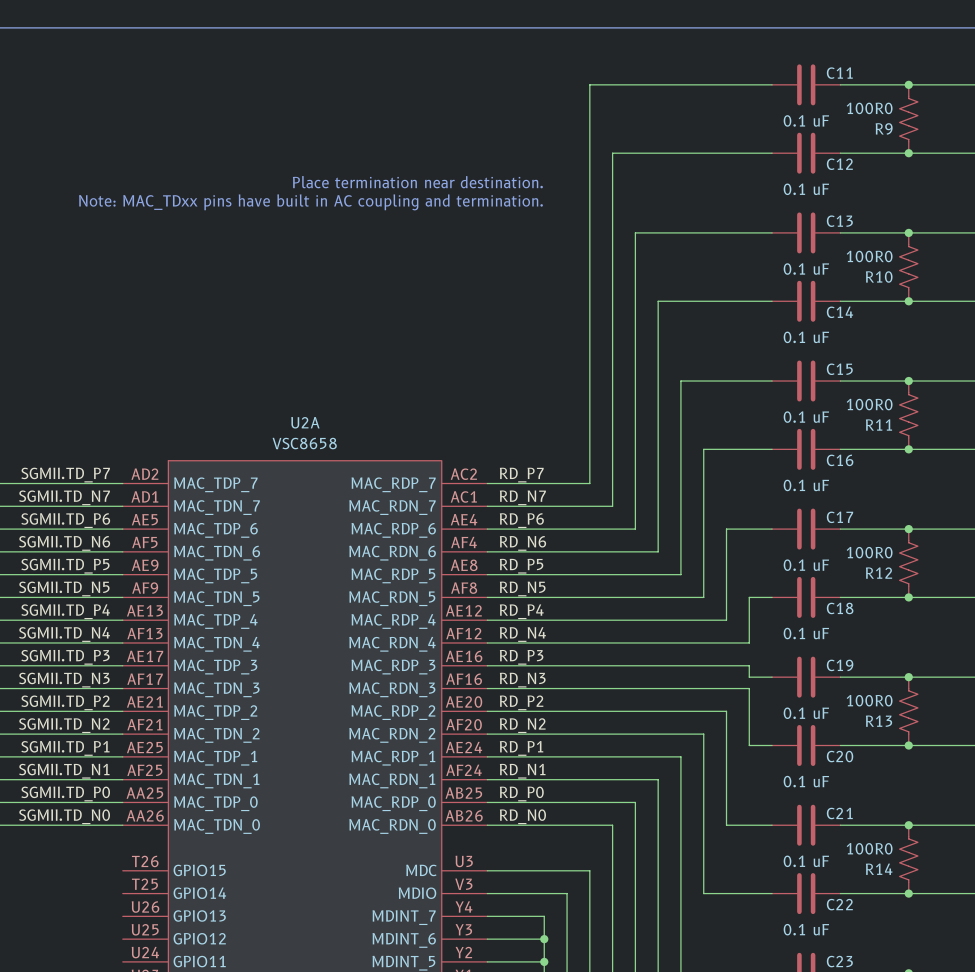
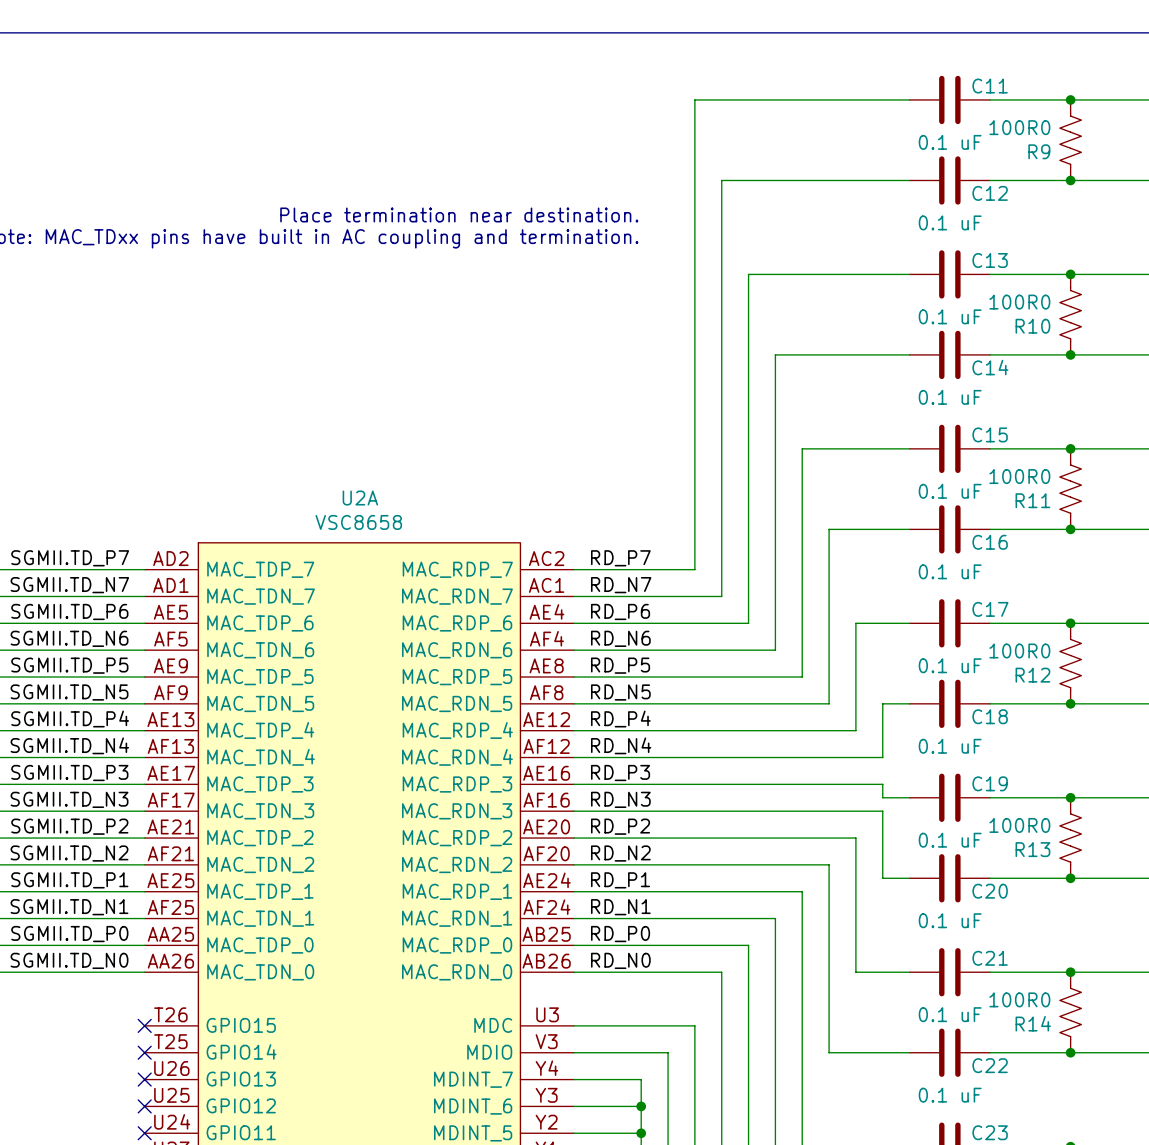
no-connect mark: none -> (144, 1025)
no-connect mark: none -> (144, 1052)
no-connect mark: none -> (144, 1079)
no-connect mark: none -> (144, 1106)
no-connect mark: none -> (144, 1133)

